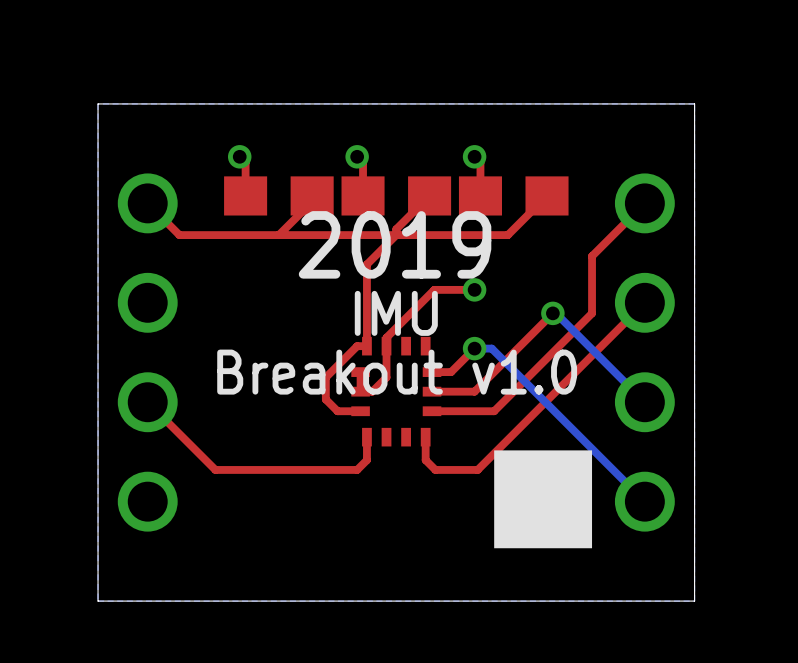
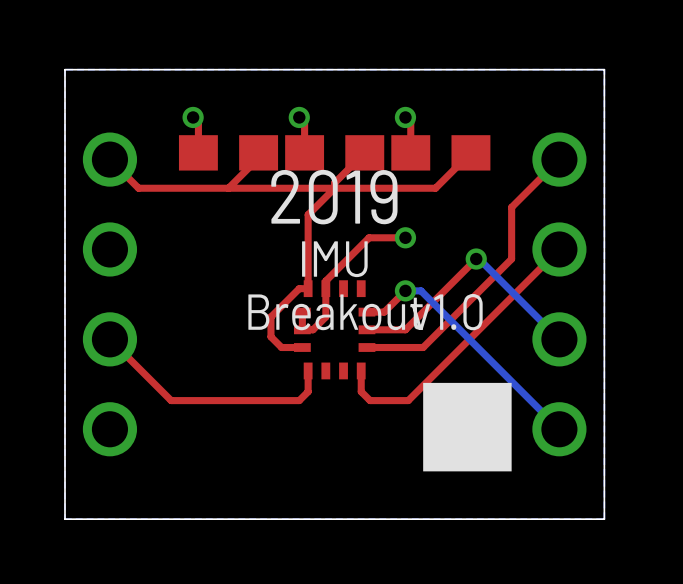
text: Breakout v1.0 (397, 372) -> Breakout (335, 312)
text: none -> v1.0 (447, 312)

